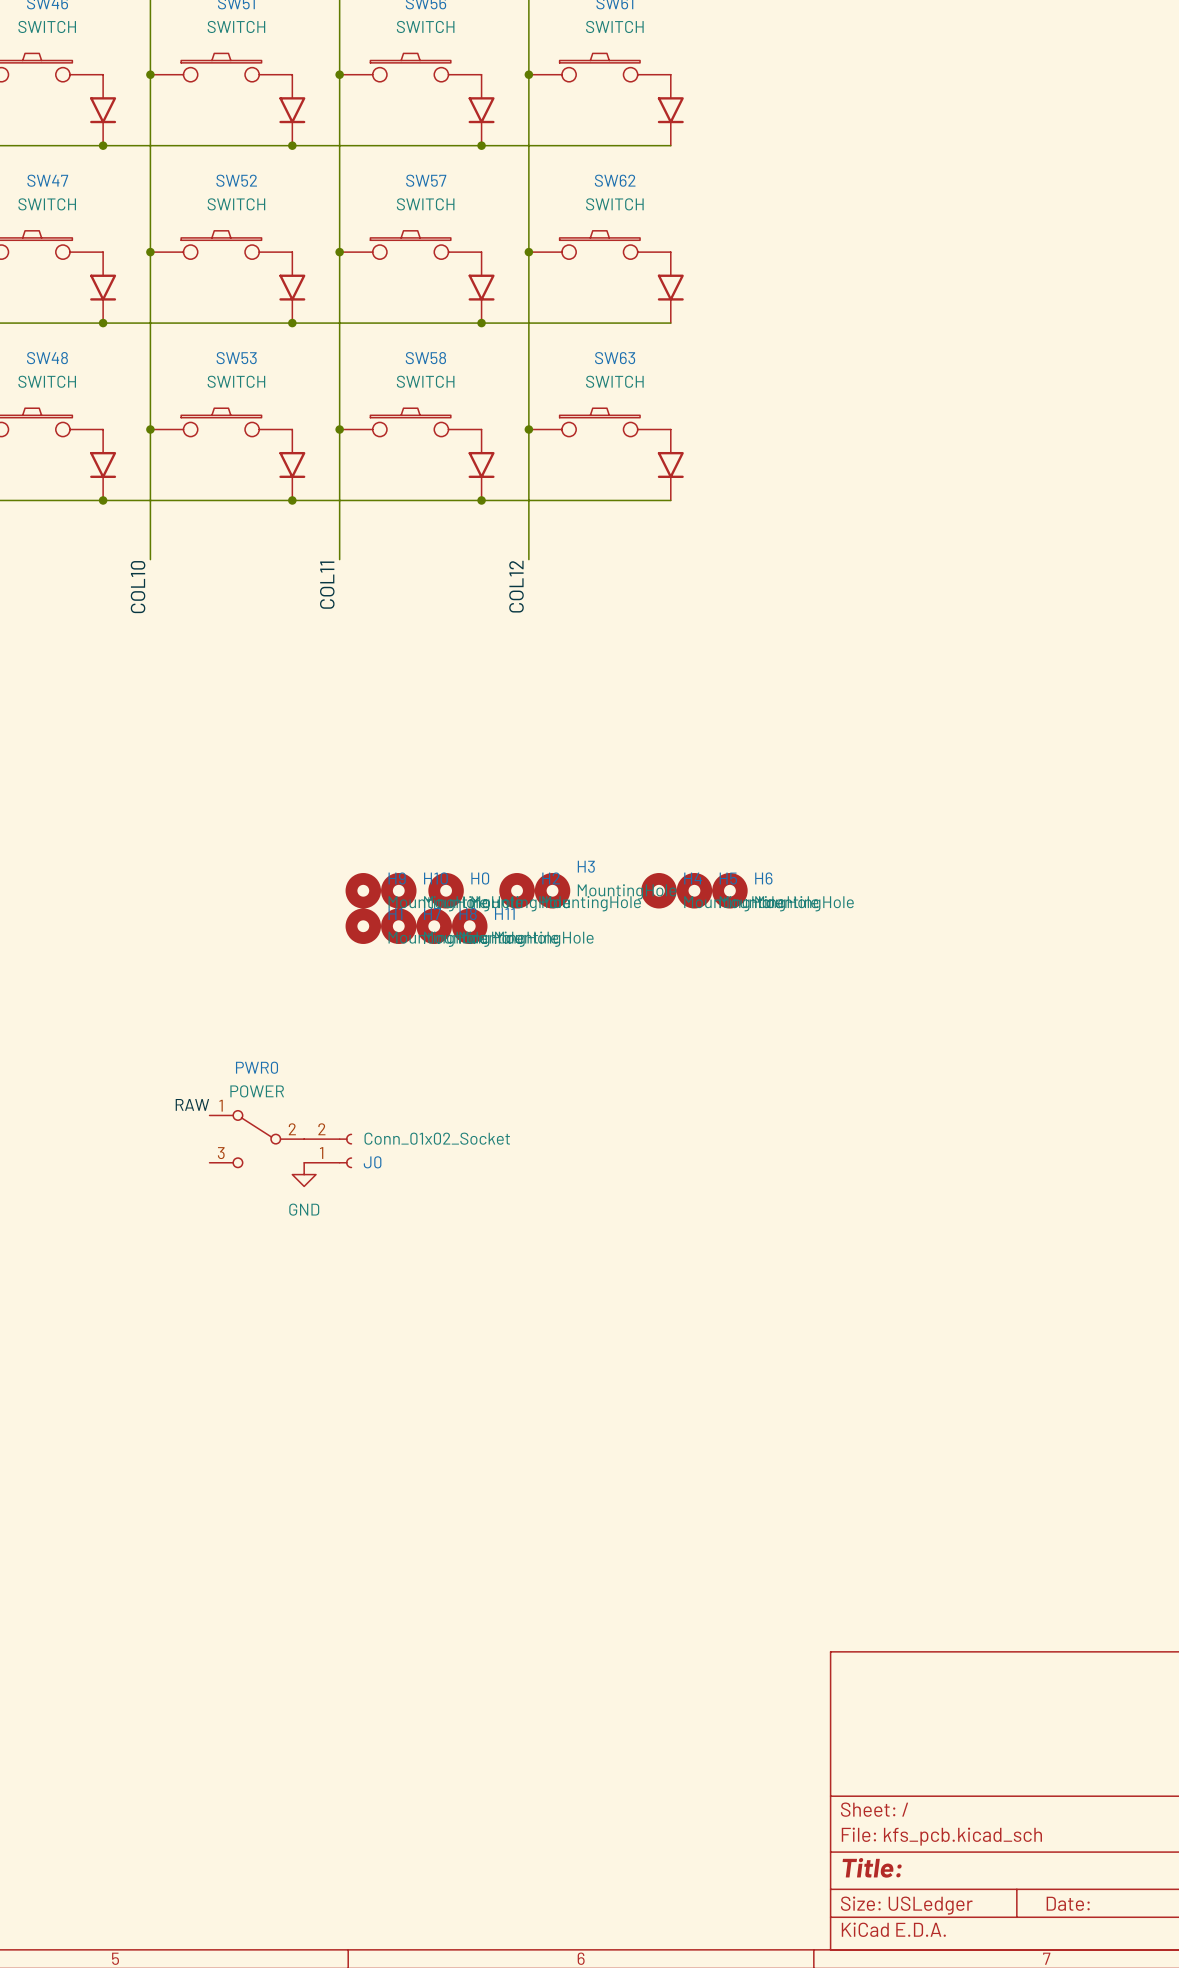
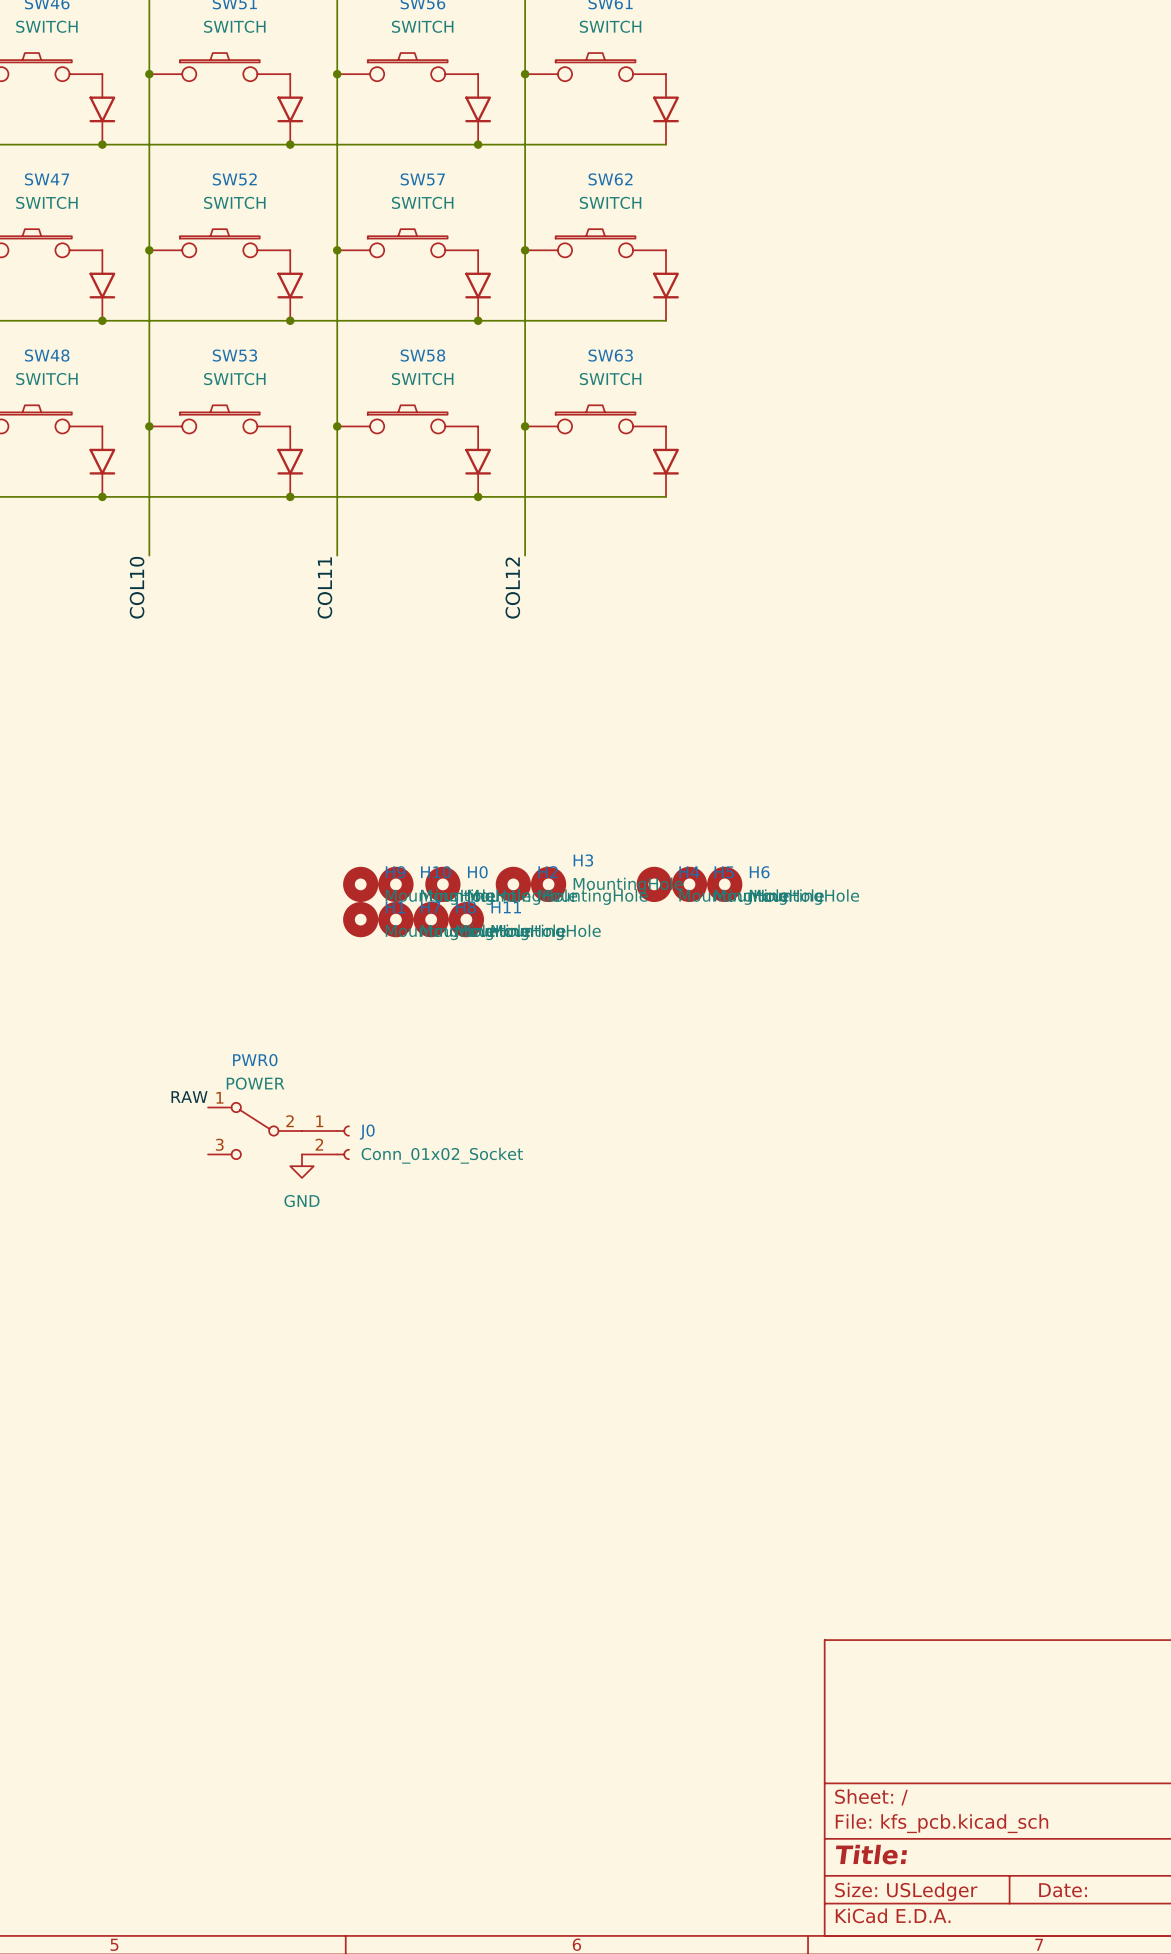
J0 flip: as is (345, 1150) -> up-down (343, 1142)

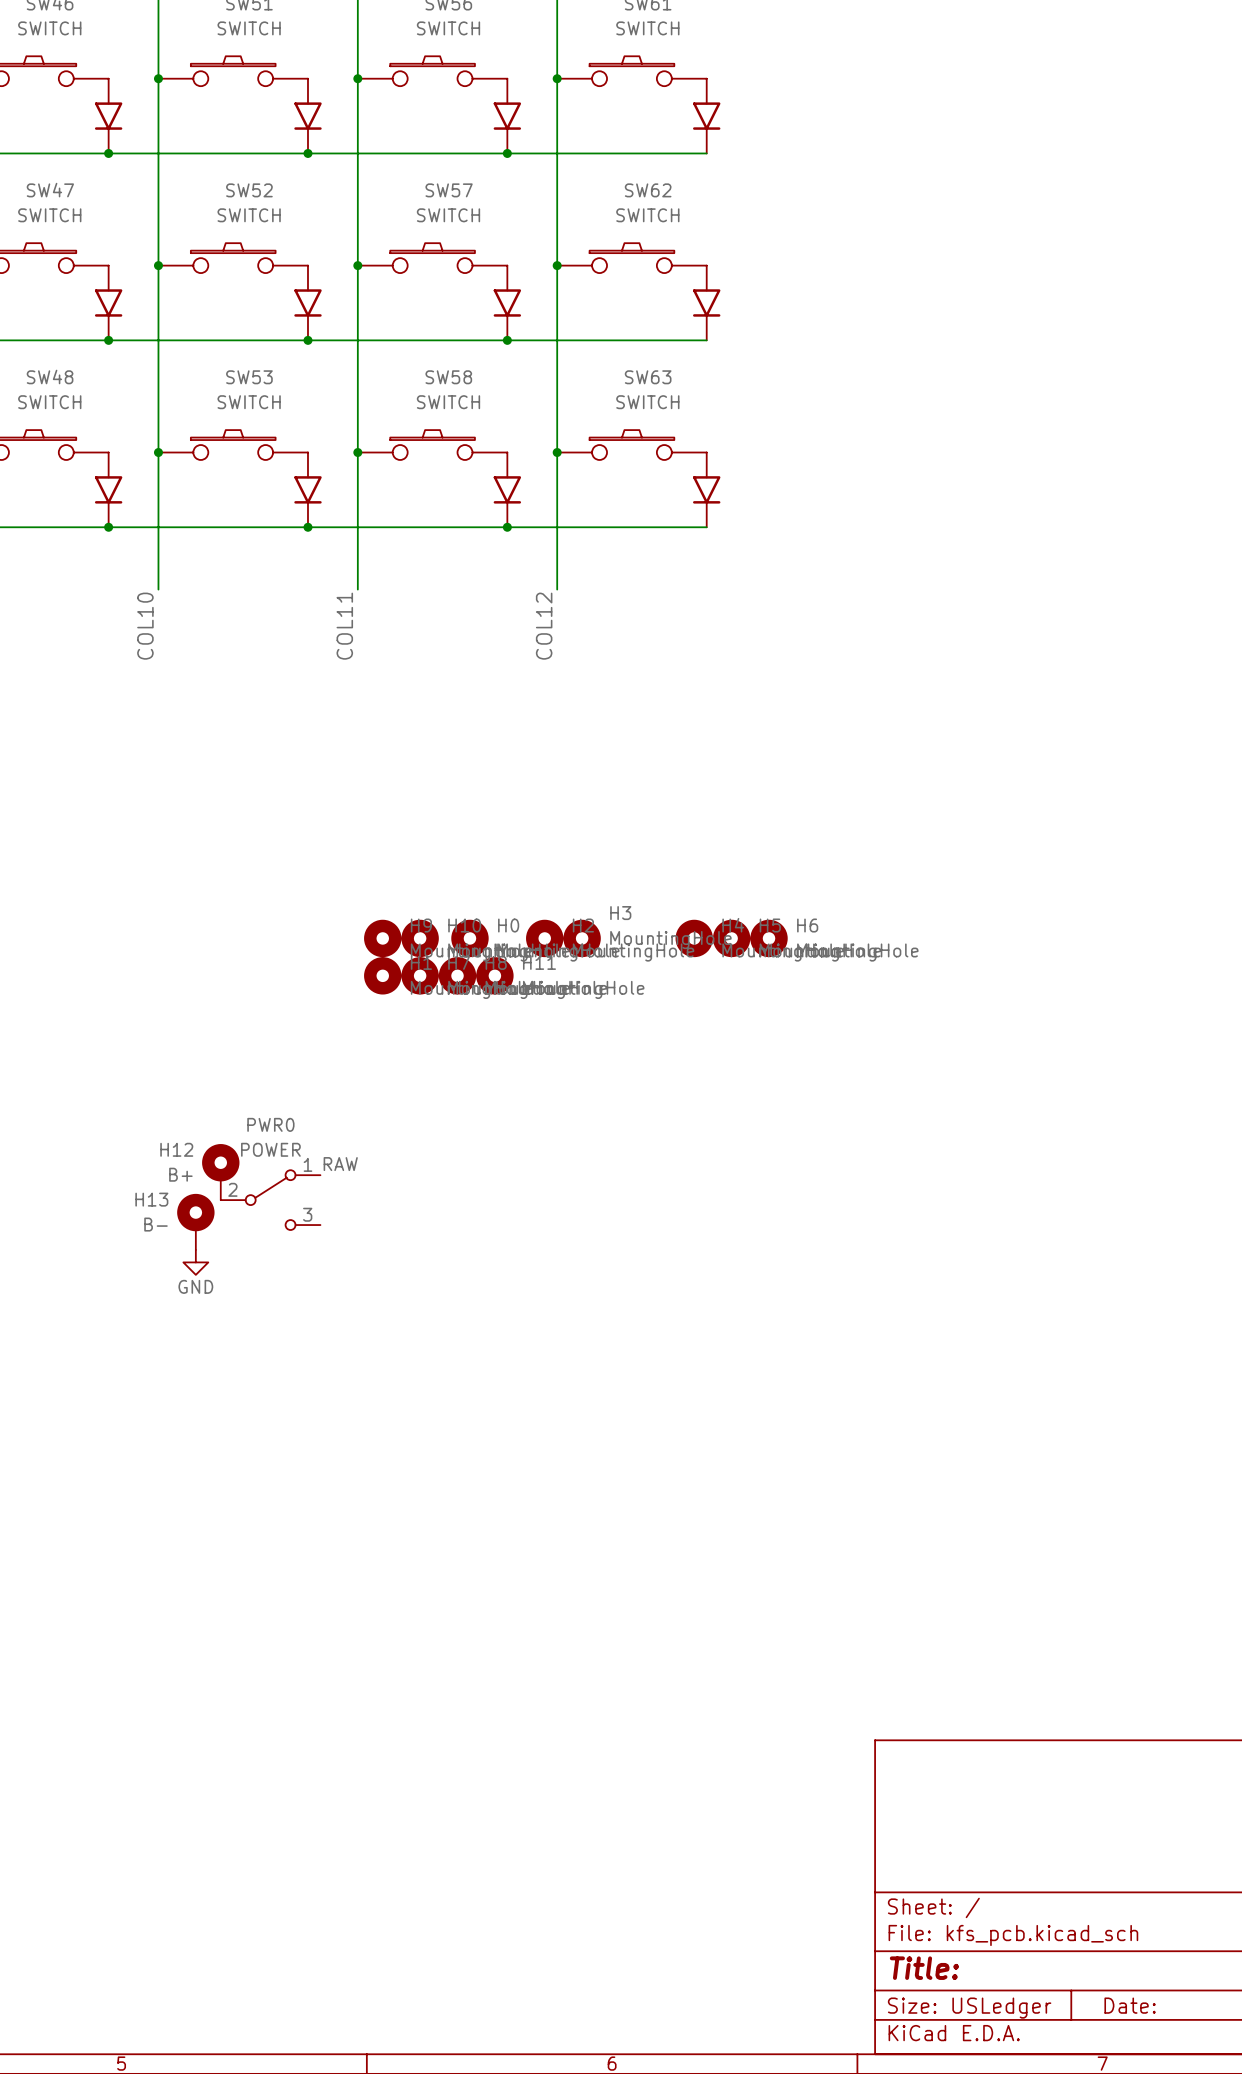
label position: RAW (189, 1097) -> RAW (340, 1164)
H12: none -> B+ (220, 1172)
PWR0 flip: as is (255, 1130) -> left-right (270, 1200)
J0: Conn_01x02_Socket (325, 1142) -> none
H13: none -> B- (195, 1221)
power symbol position: GND (301, 1166) -> GND (195, 1262)
power symbol text position: GND (301, 1201) -> GND (195, 1286)

